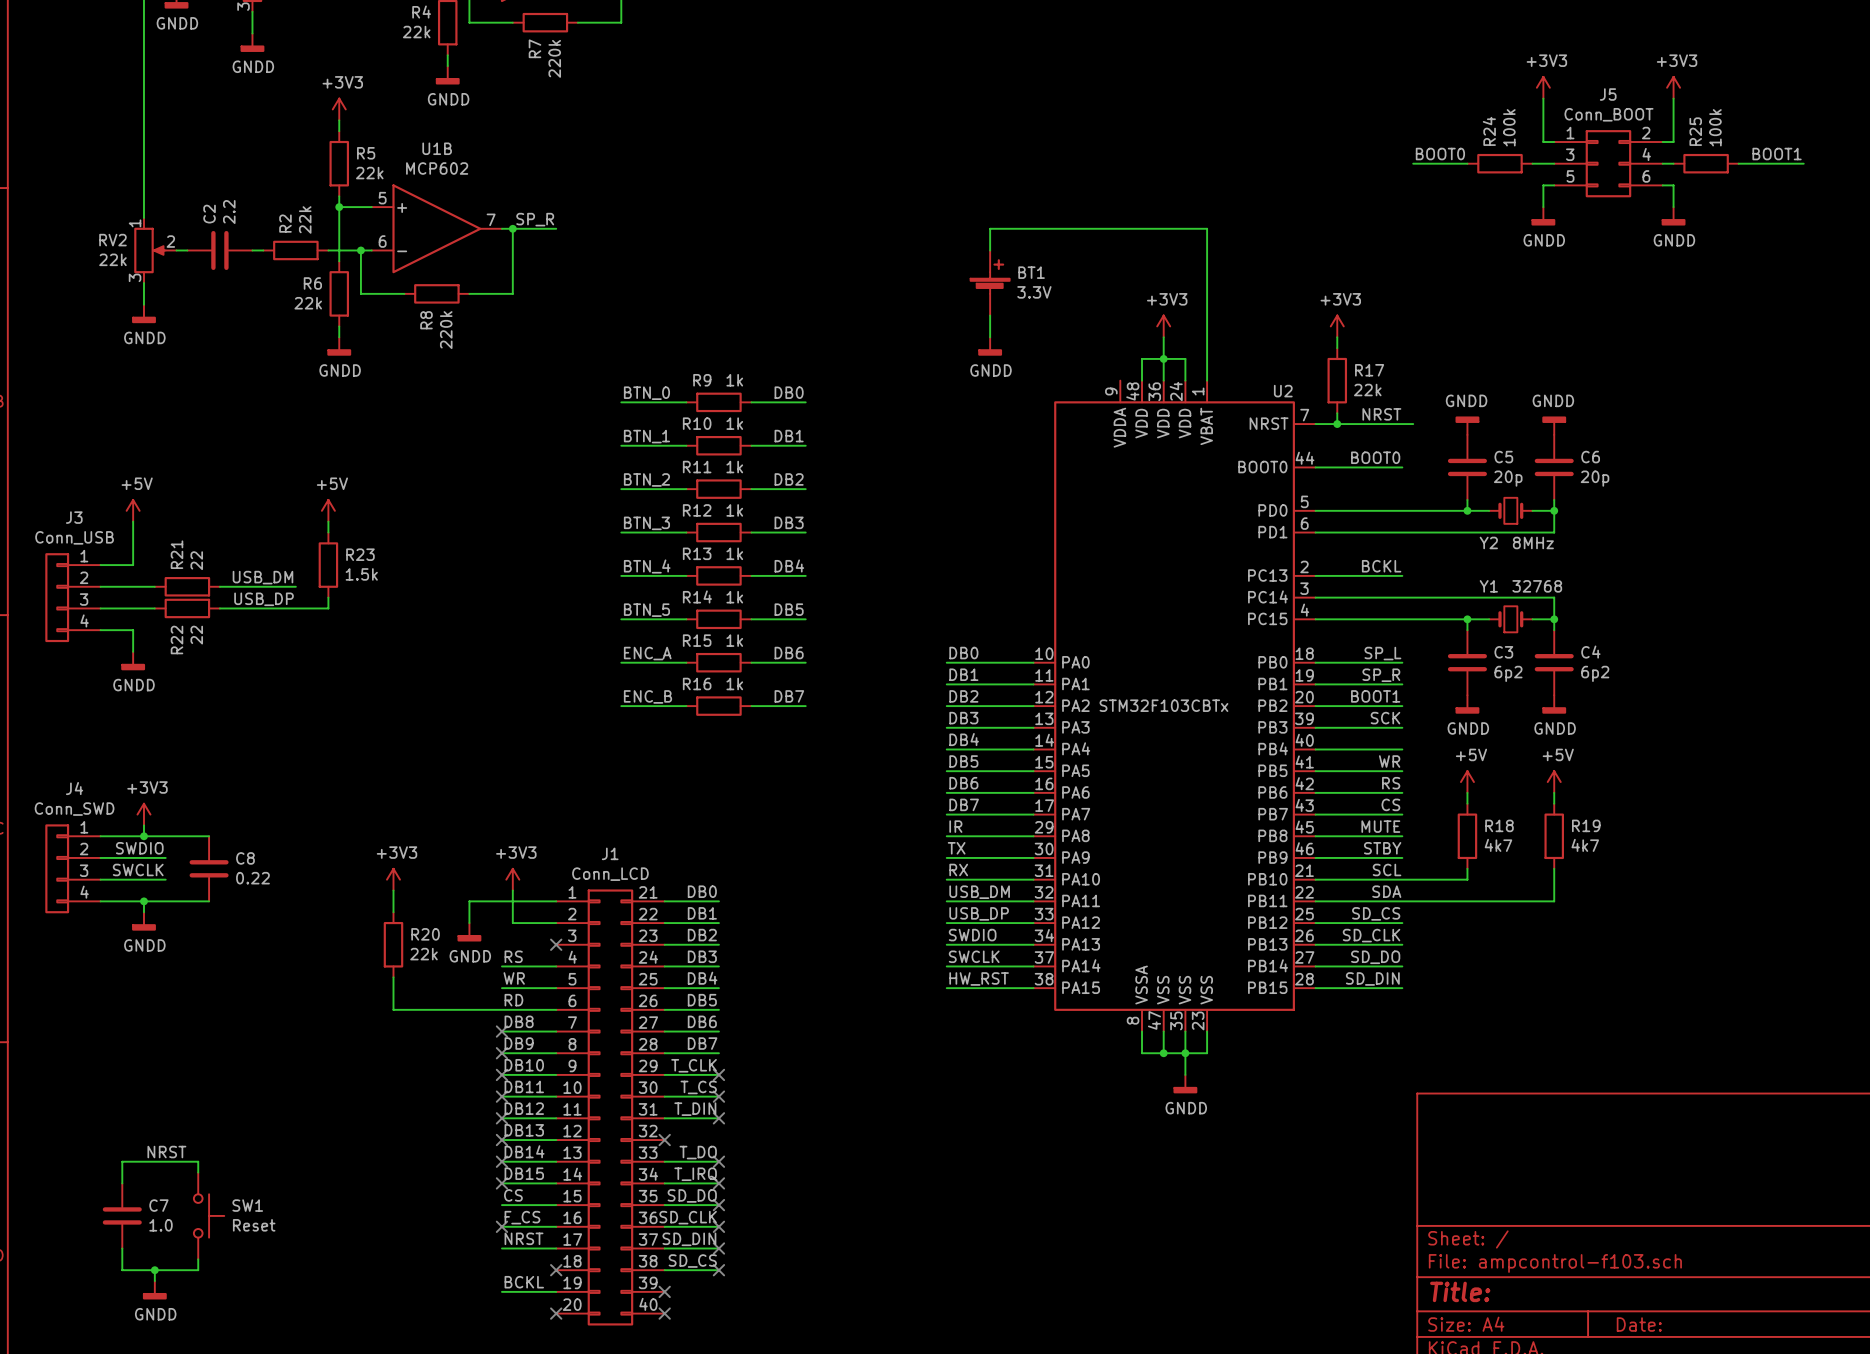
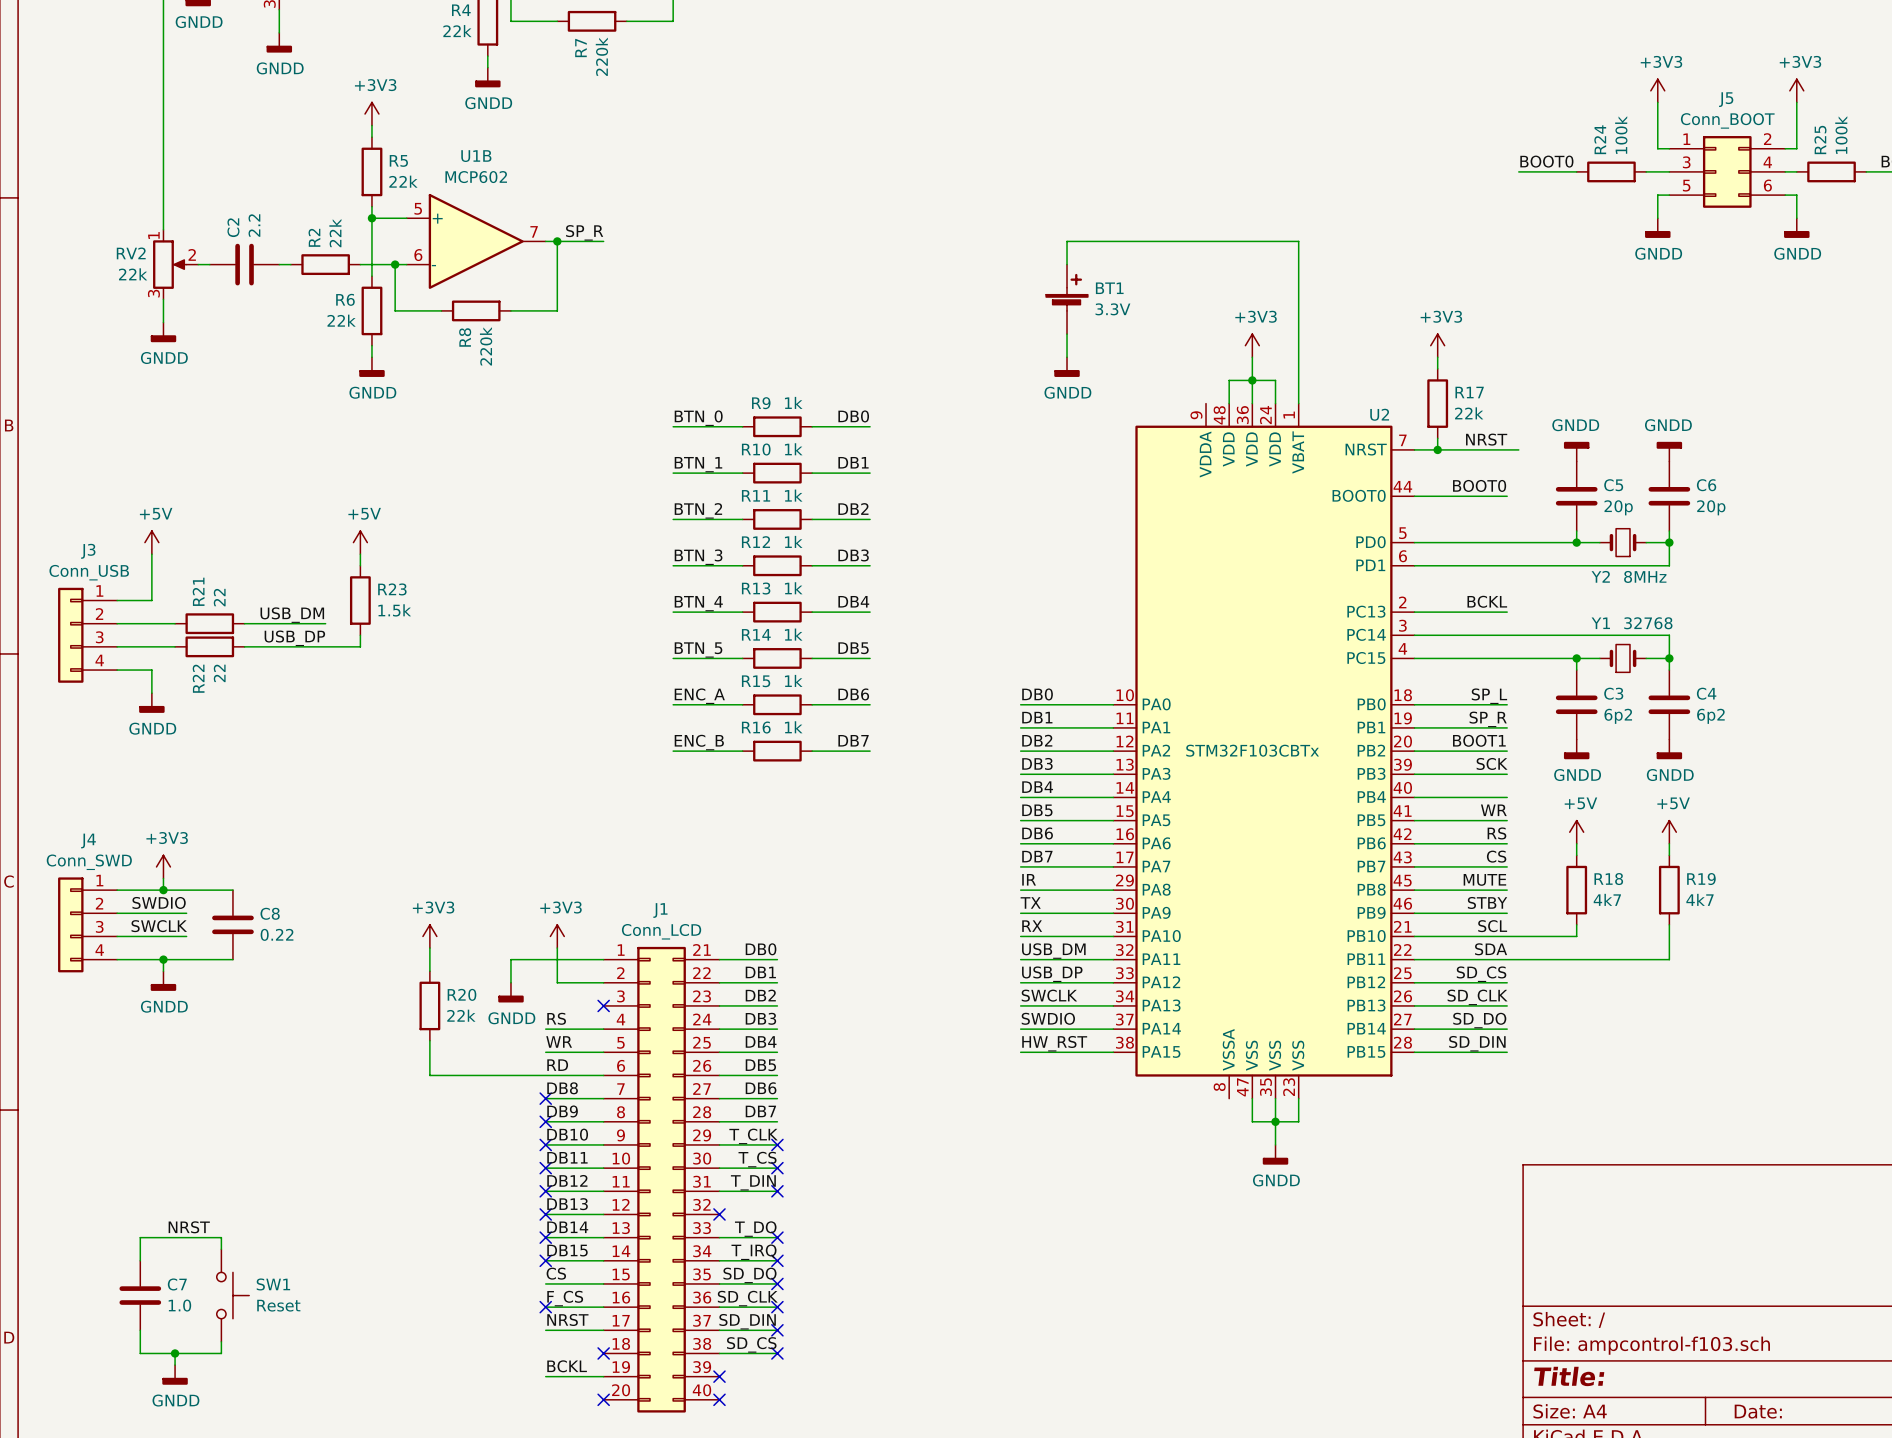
label: SWDIO (972, 935) -> SWCLK (1049, 995)
label: SWCLK (974, 956) -> SWDIO (1048, 1018)
wire: (1142, 1031) (1142, 1053) (1163, 1053) -> none
junction: (1163, 1053) -> none

